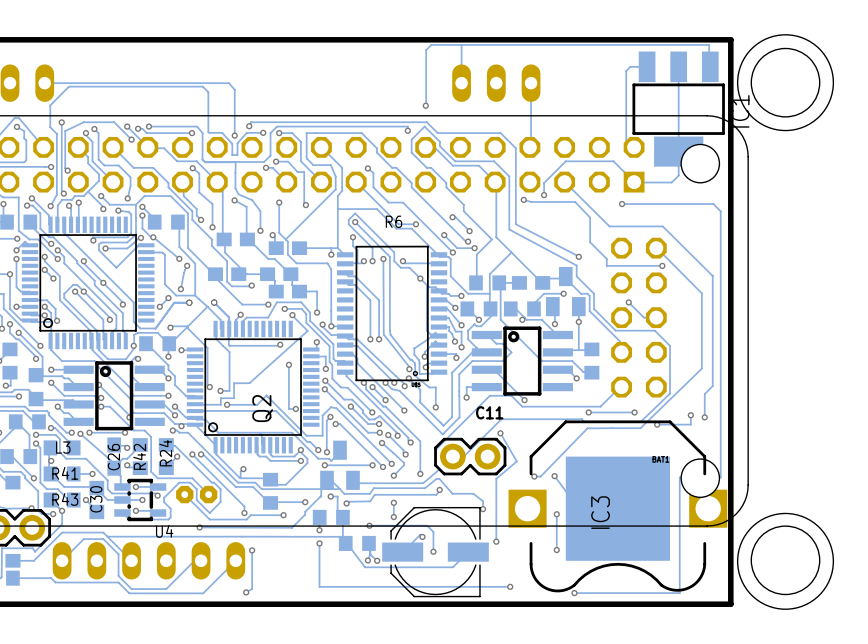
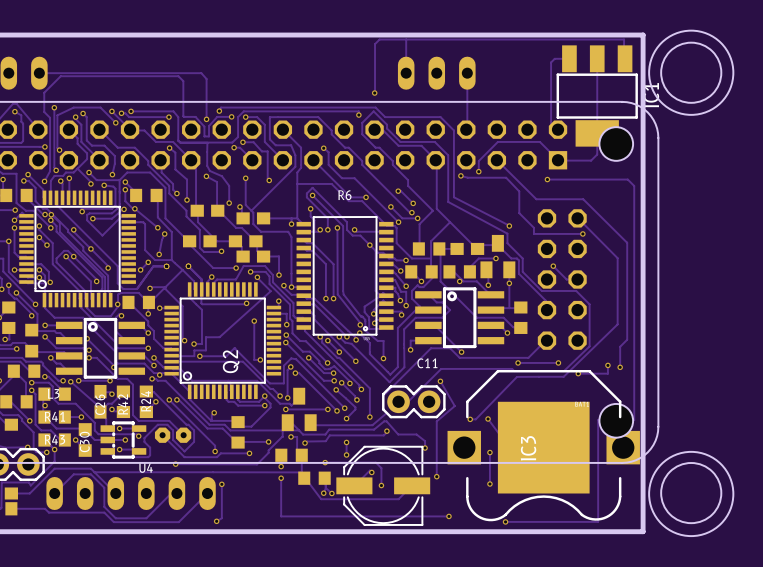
track: none -> (51, 214) (59, 222) (59, 231) (105, 277) (104, 300)
via: none -> (51, 214)

